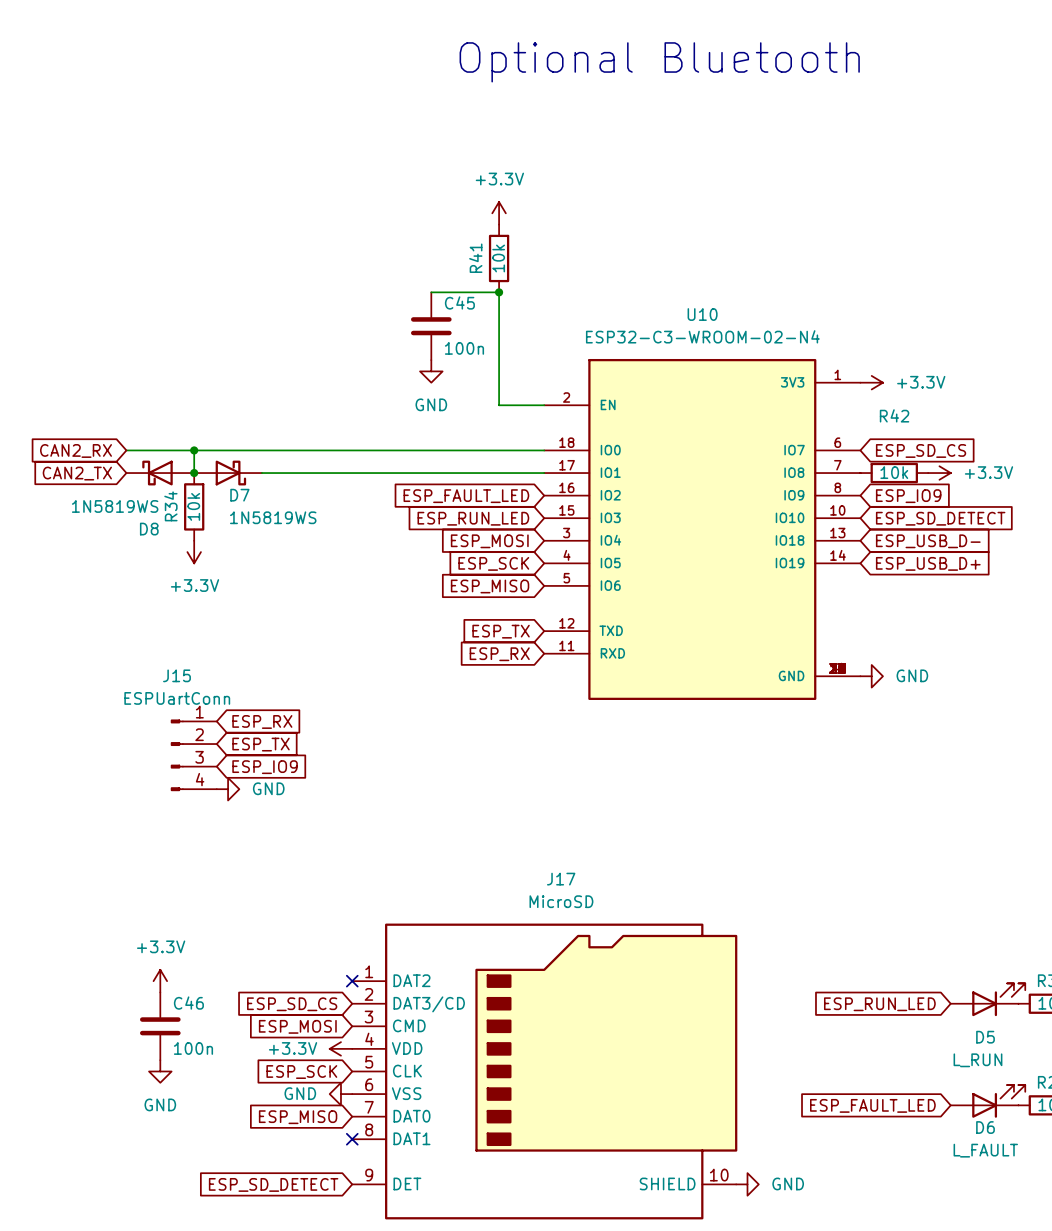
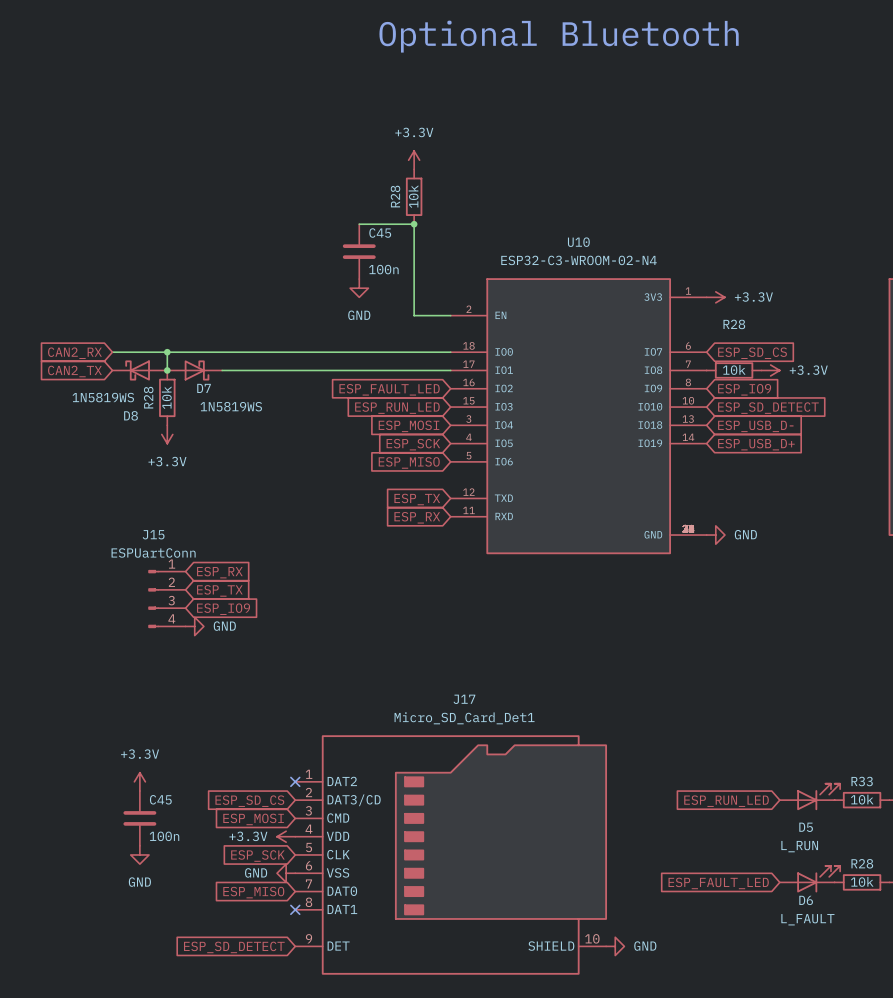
R41 name: R41 (475, 258) -> R28 (395, 196)
R42 name: R42 (894, 415) -> R28 (734, 324)
R34 name: R34 (170, 506) -> R28 (148, 397)
J17 value: MicroSD (561, 901) -> Micro_SD_Card_Det1 (464, 718)
C46 name: C46 (188, 1003) -> C45 (160, 799)

